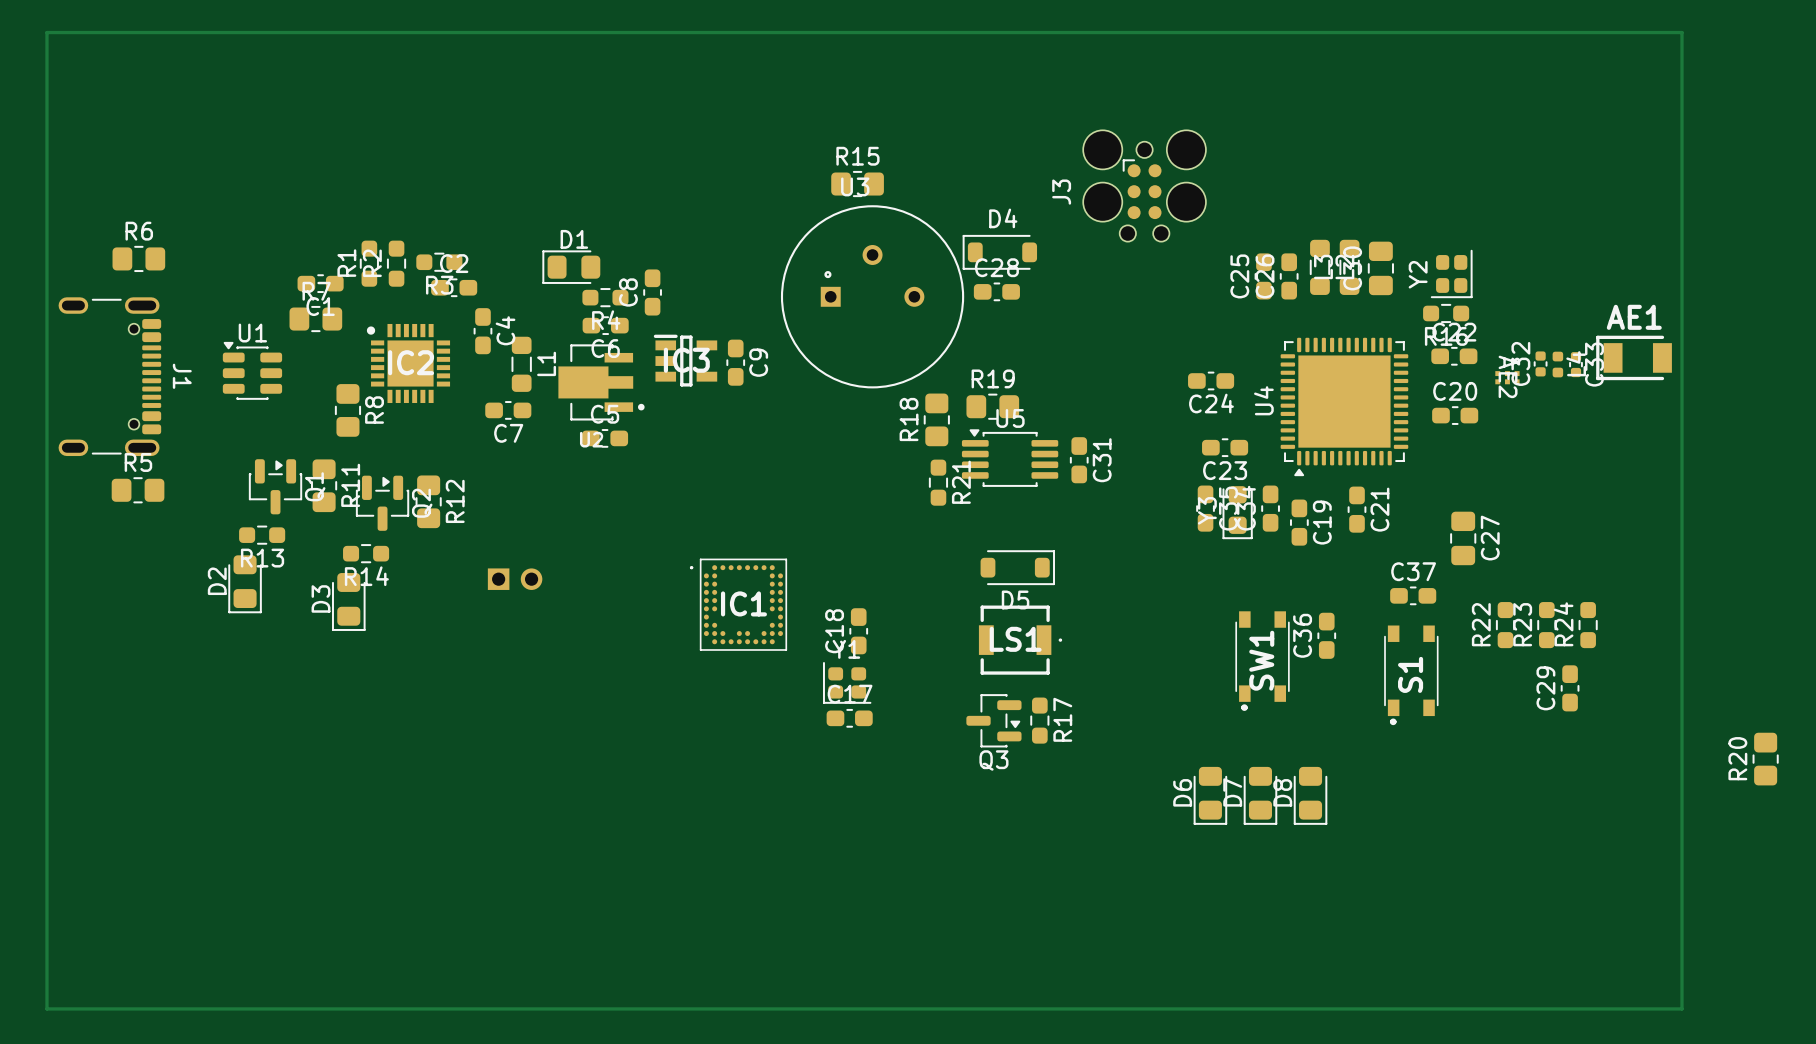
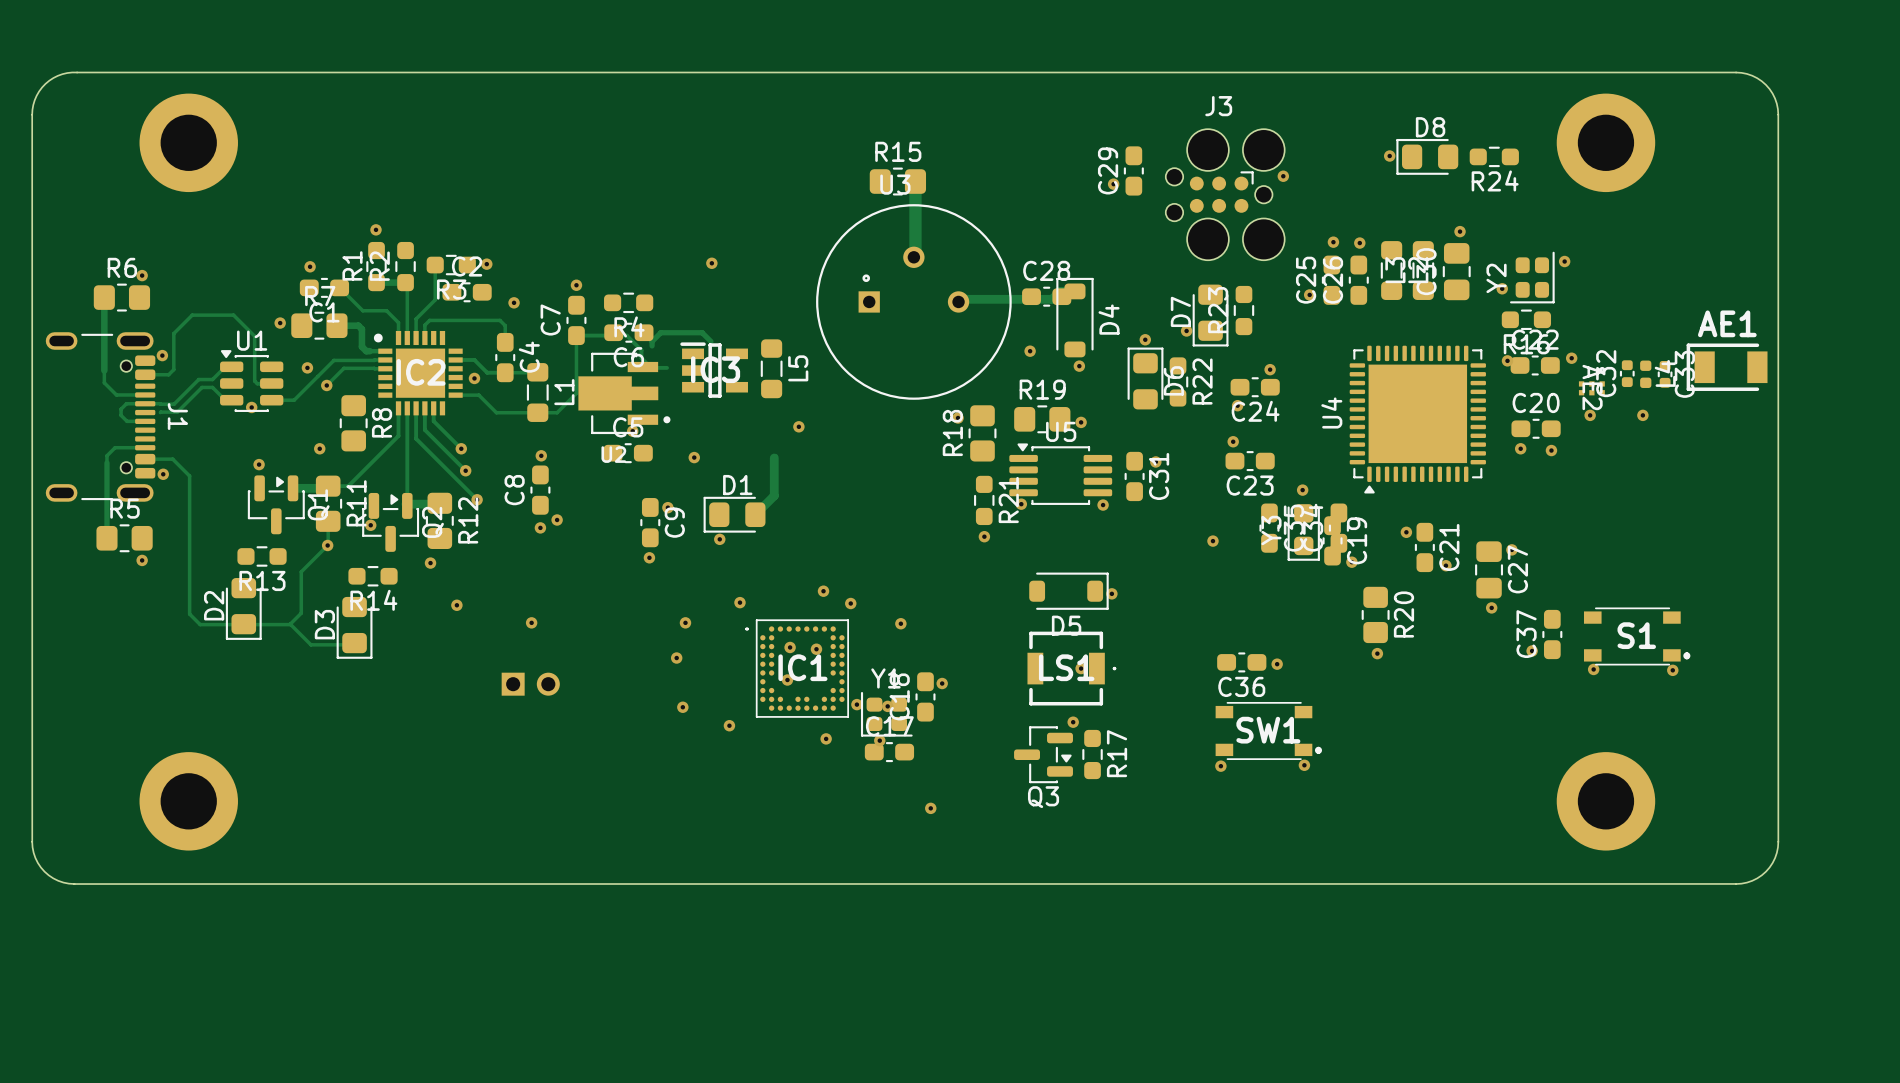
track: (46, 32) (1681, 32) (1681, 1008) (46, 1008) (46, 32) -> none
board edge: none -> (77, 72) (1736, 72) (1752, 75) (1765, 84) (1772, 93) (1778, 114) (1778, 841) (1775, 857) (1765, 871) (1757, 878) (1736, 884) (74, 884) (58, 880) (40, 867) (35, 857) (32, 841) (32, 114) (34, 100) (45, 83) (57, 75) (77, 72)
part: none -> (188, 142)
part: none -> (1605, 142)
via: none -> (1389, 156)
via: none -> (1283, 176)
track: none -> (915, 181) (915, 255) (913, 257)
J3 rotation: 0° (1144, 185) -> 90° clockwise (1225, 194)
via: none -> (1113, 184)
via: none -> (376, 229)
via: none -> (1460, 231)
via: none -> (1333, 242)
via: none -> (1359, 243)
D4 rotation: 0° (999, 252) -> 90° clockwise (1074, 317)
D4 position: (999, 252) -> (1074, 317)
R6 position: (138, 258) -> (121, 297)
via: none -> (1564, 261)
via: none -> (711, 263)
via: none -> (486, 264)
track: none -> (435, 265) (435, 299) (416, 319) (416, 338)
via: none -> (310, 266)
D1 position: (571, 267) -> (734, 514)
via: none -> (142, 275)
track: none -> (376, 282) (405, 282) (407, 284) (407, 338)
via: none -> (576, 285)
track: none -> (339, 287) (362, 310) (386, 310) (398, 322) (398, 338)
via: none -> (1502, 288)
track: none -> (1074, 291) (1060, 291) (1052, 299) (961, 299) (958, 301)
via: none -> (1309, 294)
track: none -> (104, 297) (104, 382) (116, 394) (145, 394)
C8 position: (652, 292) -> (540, 490)
via: none -> (514, 302)
via: none -> (280, 323)
track: none -> (336, 325) (358, 325) (361, 329) (361, 346) (366, 351) (385, 351)
via: none -> (1186, 330)
track: none -> (424, 338) (424, 325) (429, 320) (499, 320) (505, 325) (505, 342)
C4 position: (482, 331) -> (505, 357)
via: none -> (1145, 339)
track: none -> (710, 341) (702, 332) (660, 332) (652, 341) (652, 345)
via: none -> (1030, 351)
via: none -> (162, 355)
via: none -> (1571, 358)
track: none -> (385, 359) (333, 360) (294, 400) (271, 400)
track: none -> (455, 359) (474, 359) (487, 372) (537, 372)
via: none -> (1507, 360)
via: none -> (1079, 366)
track: none -> (231, 366) (225, 366) (212, 379) (198, 379) (174, 404) (126, 403) (121, 409) (121, 415) (127, 421) (145, 421)
via: none -> (307, 367)
track: none -> (667, 367) (651, 367) (641, 358) (641, 350) (626, 335) (576, 335) (576, 393) (557, 412) (496, 412) (478, 395) (455, 395)
track: none -> (385, 368) (343, 368) (326, 385)
L5: none -> (771, 368)
via: none -> (1270, 369)
C9 position: (735, 362) -> (650, 522)
track: none -> (145, 374) (168, 374) (173, 369) (173, 333) (192, 315) (233, 315) (254, 336) (254, 381) (259, 383)
L1 position: (521, 364) -> (537, 392)
via: none -> (474, 378)
via: none -> (326, 385)
J1 position: (109, 376) -> (100, 416)
C24 position: (1211, 380) -> (1255, 387)
track: none -> (231, 400) (225, 400) (212, 387) (202, 387) (177, 412) (160, 412)
via: none -> (1237, 405)
via: none -> (251, 407)
track: none -> (398, 408) (398, 435) (348, 486) (293, 488)
track: none -> (407, 408) (405, 504) (439, 503)
track: none -> (416, 408) (416, 438) (477, 499)
track: none -> (424, 408) (424, 429) (465, 470)
track: none -> (433, 408) (433, 421) (461, 448)
via: none -> (1590, 415)
via: none -> (1642, 415)
via: none -> (958, 418)
via: none -> (1081, 422)
C7 rotation: 0° (508, 410) -> 90° clockwise (576, 320)
C7 position: (508, 410) -> (576, 320)
via: none -> (798, 426)
via: none -> (632, 431)
via: none -> (1233, 441)
track: none -> (145, 447) (115, 447) (106, 455) (106, 538)
via: none -> (319, 448)
via: none -> (461, 448)
via: none -> (1520, 448)
via: none -> (1551, 450)
via: none -> (541, 455)
track: none -> (775, 456) (774, 495) (755, 514)
via: none -> (694, 457)
track: none -> (145, 459) (172, 459) (189, 476) (189, 614) (200, 624) (290, 624)
via: none -> (1155, 461)
C23 position: (1225, 447) -> (1250, 461)
via: none -> (259, 464)
via: none -> (465, 470)
via: none -> (163, 474)
via: none -> (1302, 490)
via: none -> (477, 499)
via: none -> (1021, 504)
via: none -> (1103, 505)
via: none -> (667, 507)
R5 position: (138, 490) -> (124, 538)
via: none -> (557, 519)
track: none -> (328, 521) (328, 544) (301, 571) (301, 613) (290, 624)
via: none -> (370, 525)
via: none -> (540, 527)
C21 position: (1357, 509) -> (1424, 547)
via: none -> (1406, 532)
via: none -> (984, 536)
via: none -> (719, 539)
via: none -> (1212, 541)
C19 position: (1299, 522) -> (1332, 540)
via: none -> (327, 545)
via: none -> (1511, 549)
via: none -> (649, 557)
via: none -> (142, 560)
C27 position: (1463, 538) -> (1489, 569)
via: none -> (1351, 562)
via: none -> (430, 563)
via: none -> (1445, 565)
via: none -> (823, 591)
via: none -> (1111, 593)
C37 name position: C37 (1413, 571) -> C37 (1526, 634)
via: none -> (739, 602)
part position: (515, 579) -> (530, 684)
via: none -> (850, 603)
via: none -> (456, 605)
via: none -> (1491, 607)
C37 rotation: 0° (1413, 595) -> 90° clockwise (1552, 634)
C37 position: (1413, 595) -> (1552, 634)
via: none -> (531, 622)
via: none -> (685, 622)
track: none -> (290, 624) (310, 644) (356, 644)
via: none -> (900, 623)
IC1 position: (738, 604) -> (797, 668)
via: none -> (790, 647)
via: none -> (816, 649)
via: none -> (1532, 650)
R22 name position: R22 (1481, 624) -> R22 (1202, 381)
R24 name position: R24 (1563, 624) -> R24 (1495, 180)
R22 position: (1505, 625) -> (1178, 381)
R23 position: (1546, 625) -> (1243, 310)
R24 rotation: 0° (1588, 625) -> 90° clockwise (1494, 156)
R24 position: (1588, 625) -> (1494, 156)
via: none -> (1377, 653)
via: none -> (676, 658)
C18 position: (858, 631) -> (925, 696)
via: none -> (1277, 664)
C36 name position: C36 (1302, 635) -> C36 (1241, 686)
C36 rotation: 0° (1326, 635) -> 90° clockwise (1241, 662)
C36 position: (1326, 635) -> (1241, 662)
via: none -> (1081, 668)
via: none -> (1593, 669)
via: none -> (1672, 670)
via: none -> (787, 680)
via: none -> (942, 683)
SW1 rotation: 0° (1262, 661) -> 90° counterclockwise (1268, 730)
SW1 position: (1262, 661) -> (1268, 730)
via: none -> (856, 704)
via: none -> (887, 706)
S1 rotation: 0° (1411, 675) -> 90° counterclockwise (1637, 636)
S1 position: (1411, 675) -> (1637, 636)
via: none -> (682, 707)
C29 position: (1570, 688) -> (1133, 170)
via: none -> (1073, 722)
via: none -> (729, 725)
via: none -> (826, 738)
via: none -> (879, 740)
via: none -> (1304, 765)
via: none -> (1220, 766)
R20 name position: R20 (1737, 758) -> R20 (1403, 614)
R20 position: (1765, 759) -> (1375, 614)
part: none -> (188, 801)
part: none -> (1605, 801)
via: none -> (930, 808)
D6 rotation: 0° (1210, 795) -> 180° (1145, 378)
D6 position: (1210, 795) -> (1145, 378)
D7 position: (1260, 795) -> (1210, 315)
D8 rotation: 0° (1310, 795) -> 90° clockwise (1427, 156)
D8 position: (1310, 795) -> (1427, 156)

